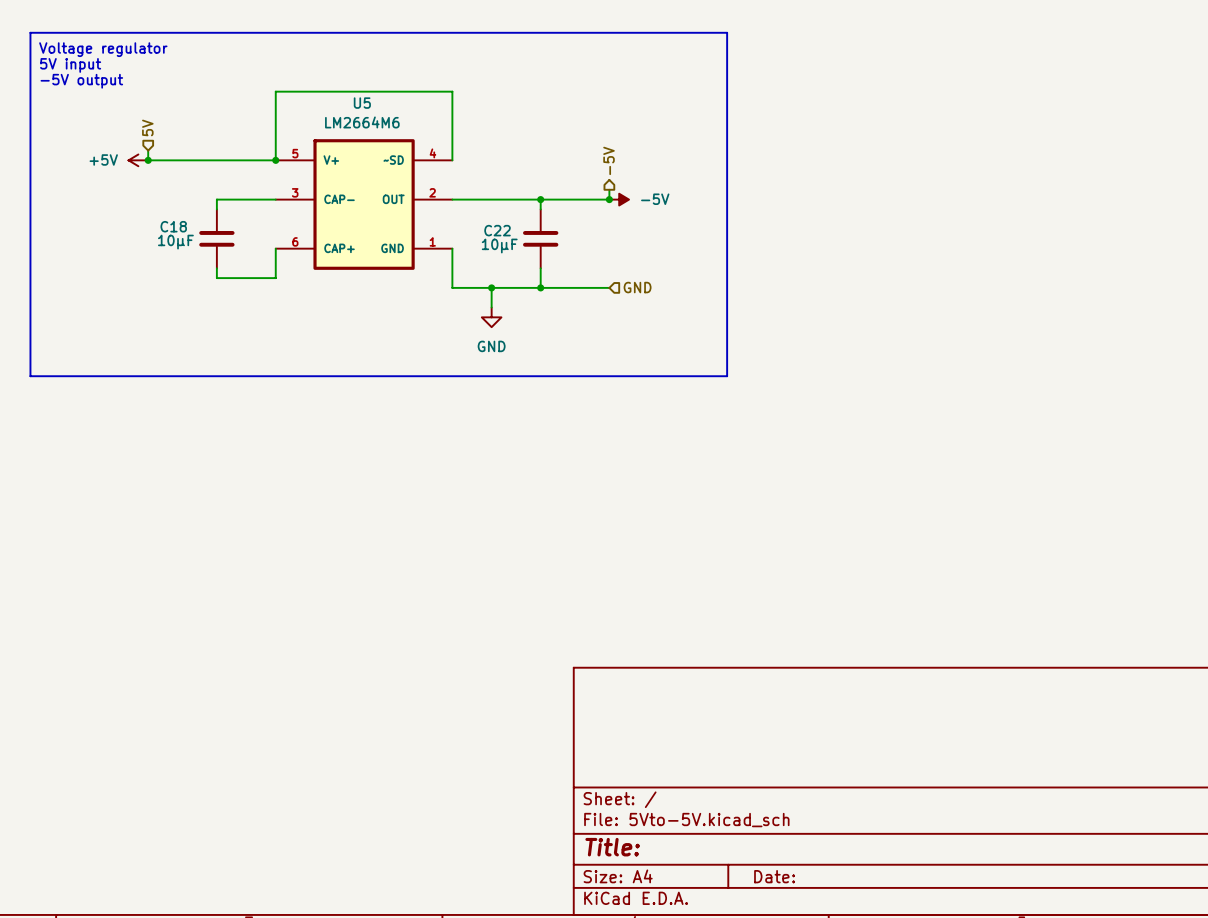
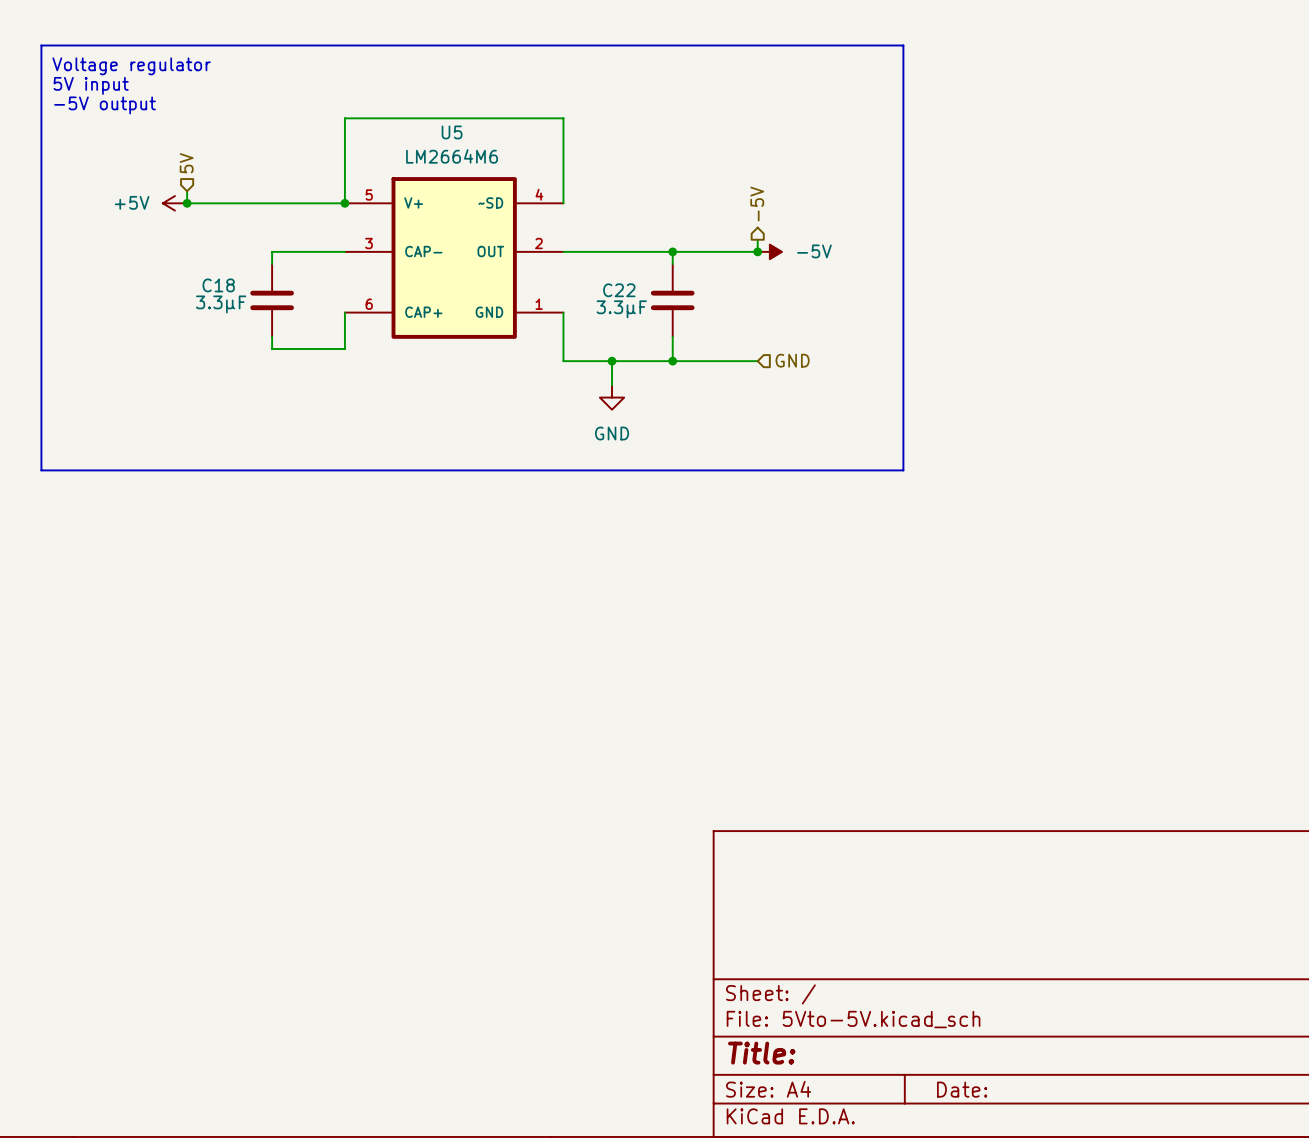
C18 value: 10µF (175, 242) -> 3.3µF (221, 304)
C22 value: 10µF (499, 246) -> 3.3µF (621, 309)

